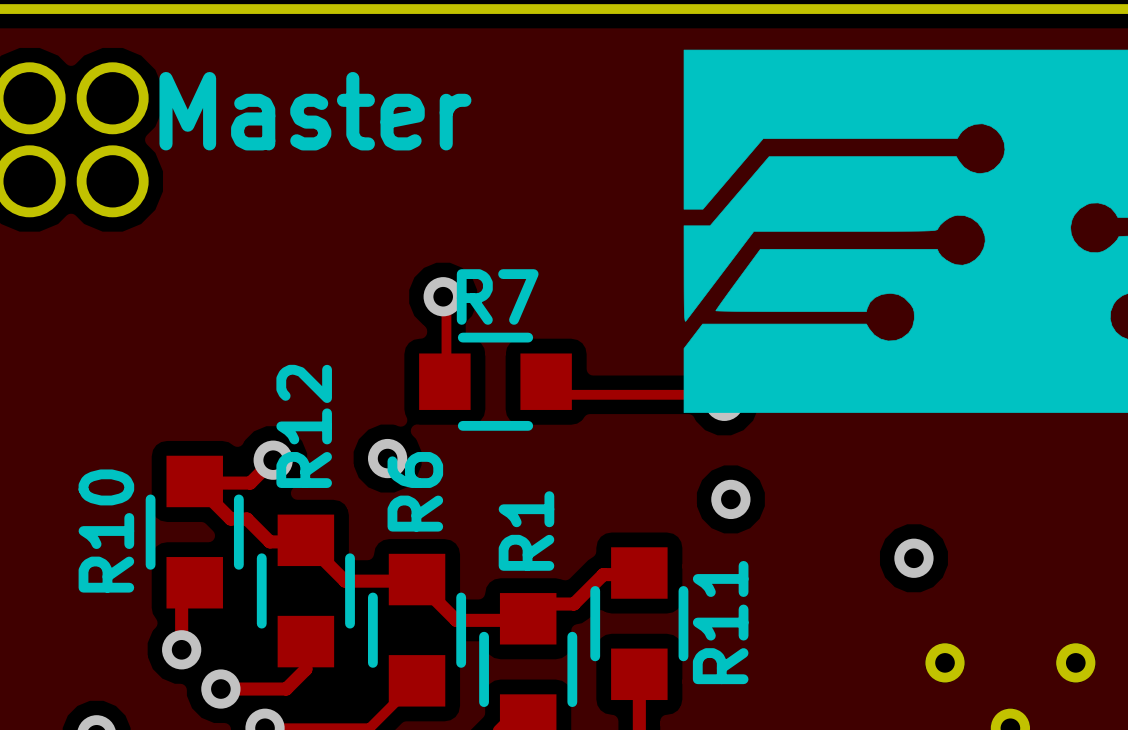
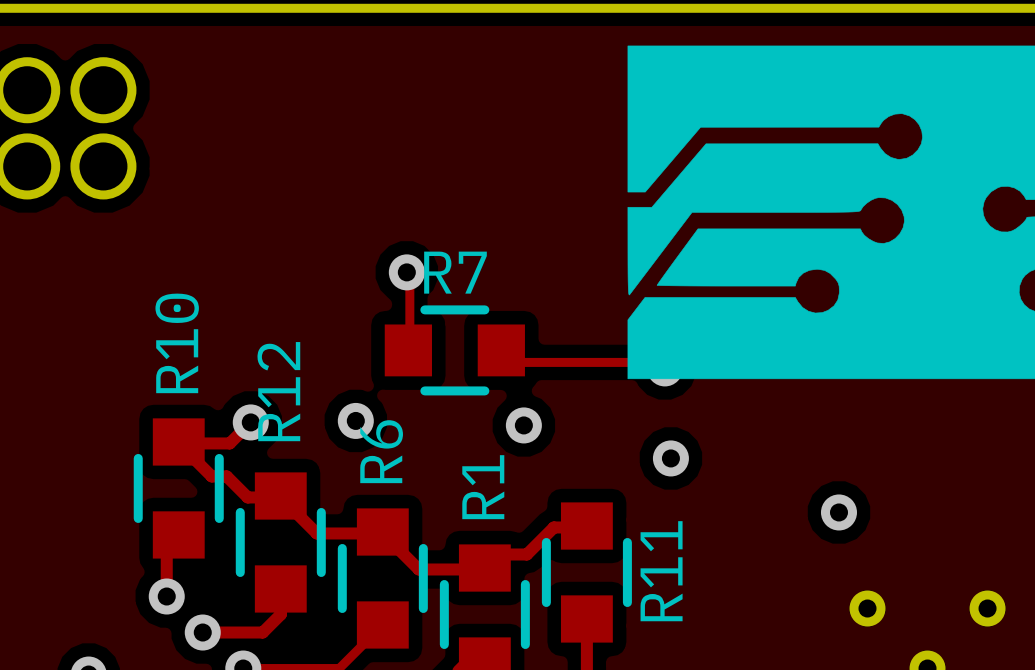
text: Master (315, 111) -> none
via: none -> (523, 425)
R10 name position: R10 (106, 531) -> R10 (177, 343)

